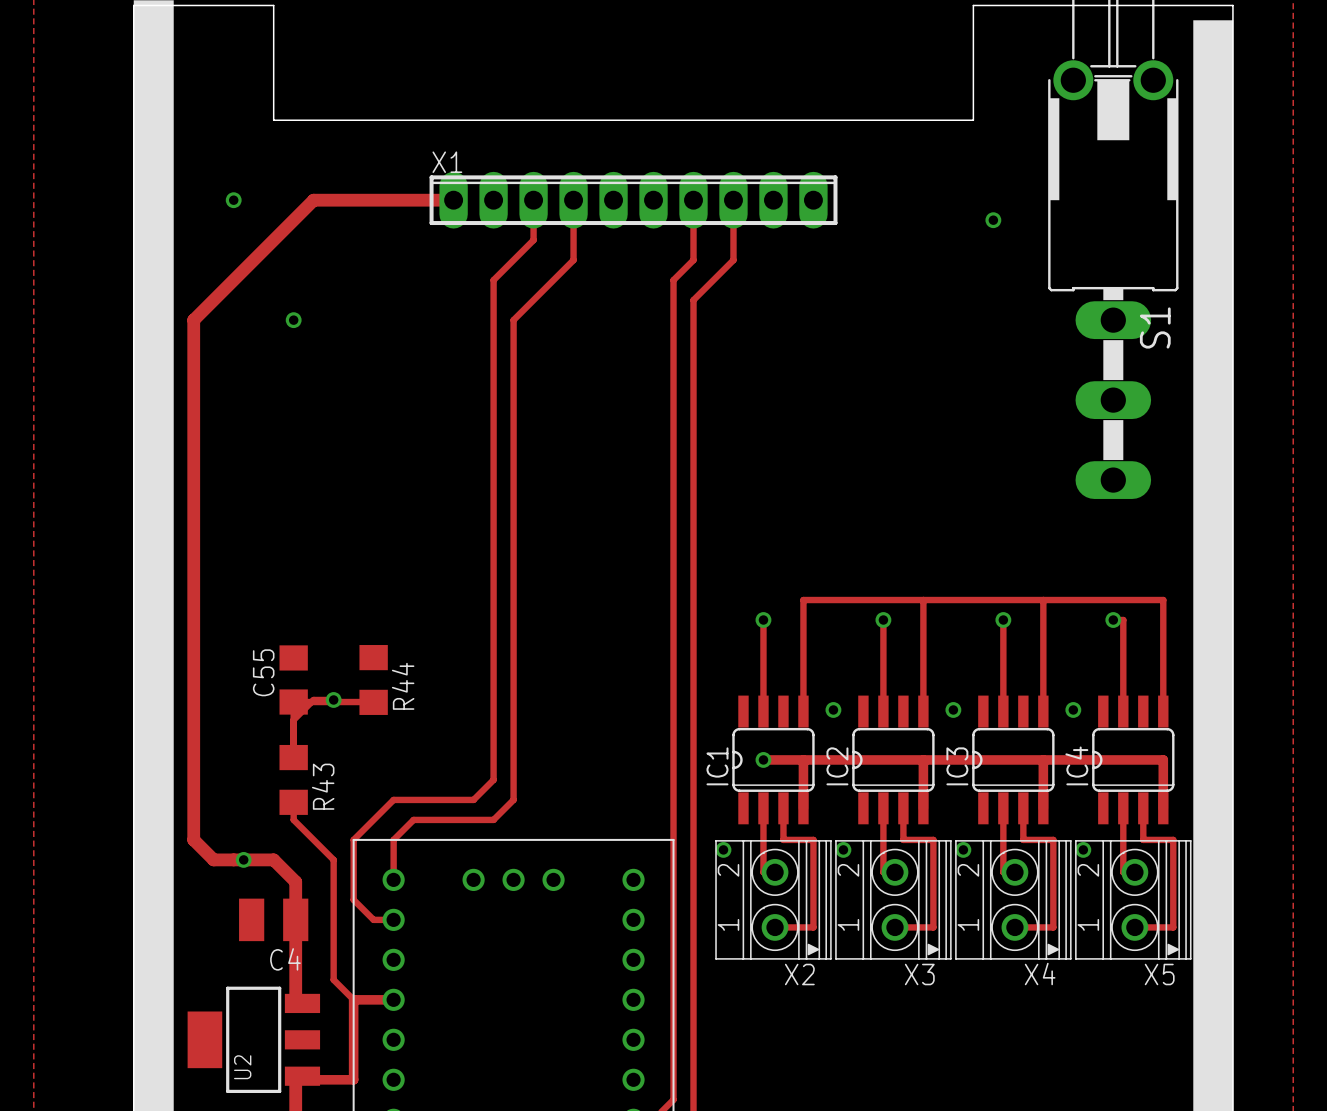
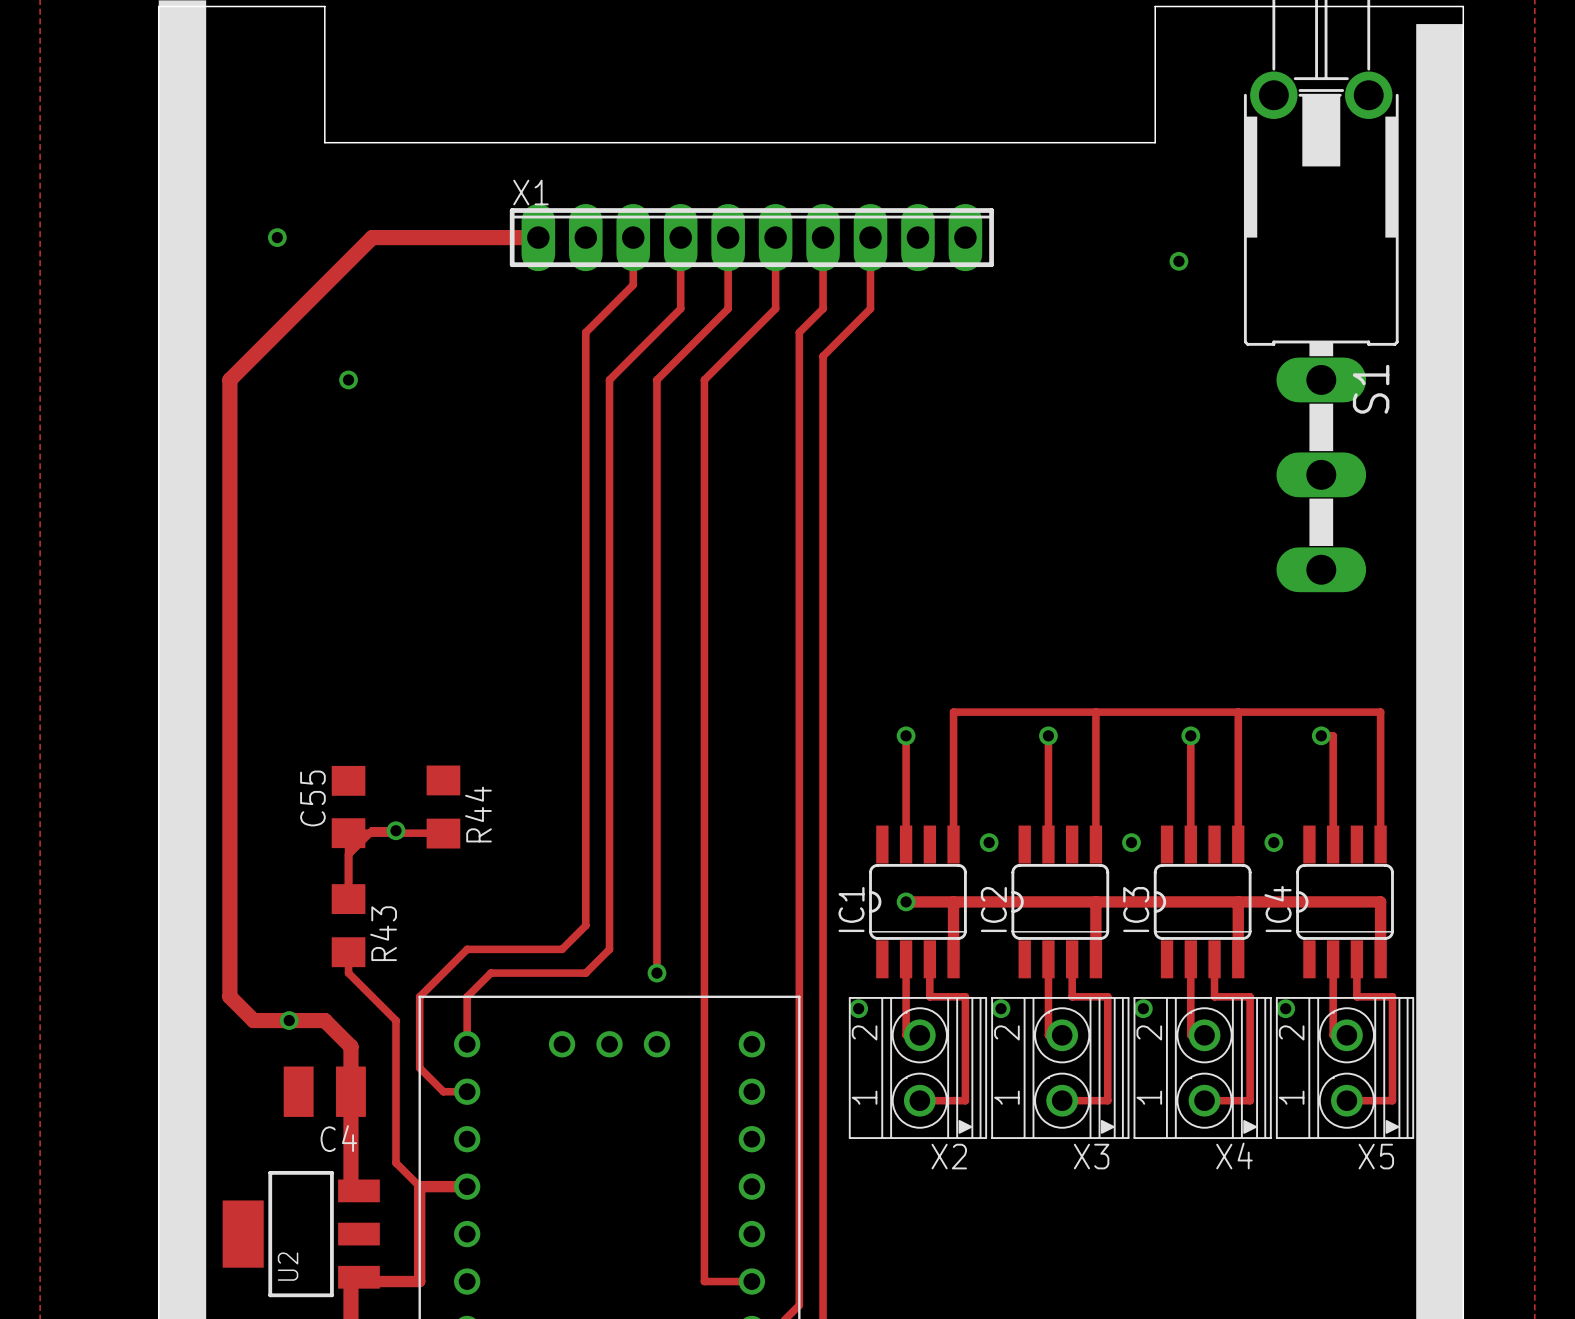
track: none -> (728, 237) (728, 308) (656, 379) (656, 973)
track: none -> (775, 237) (775, 308) (704, 379) (704, 1281) (751, 1281)
via: none -> (656, 973)

